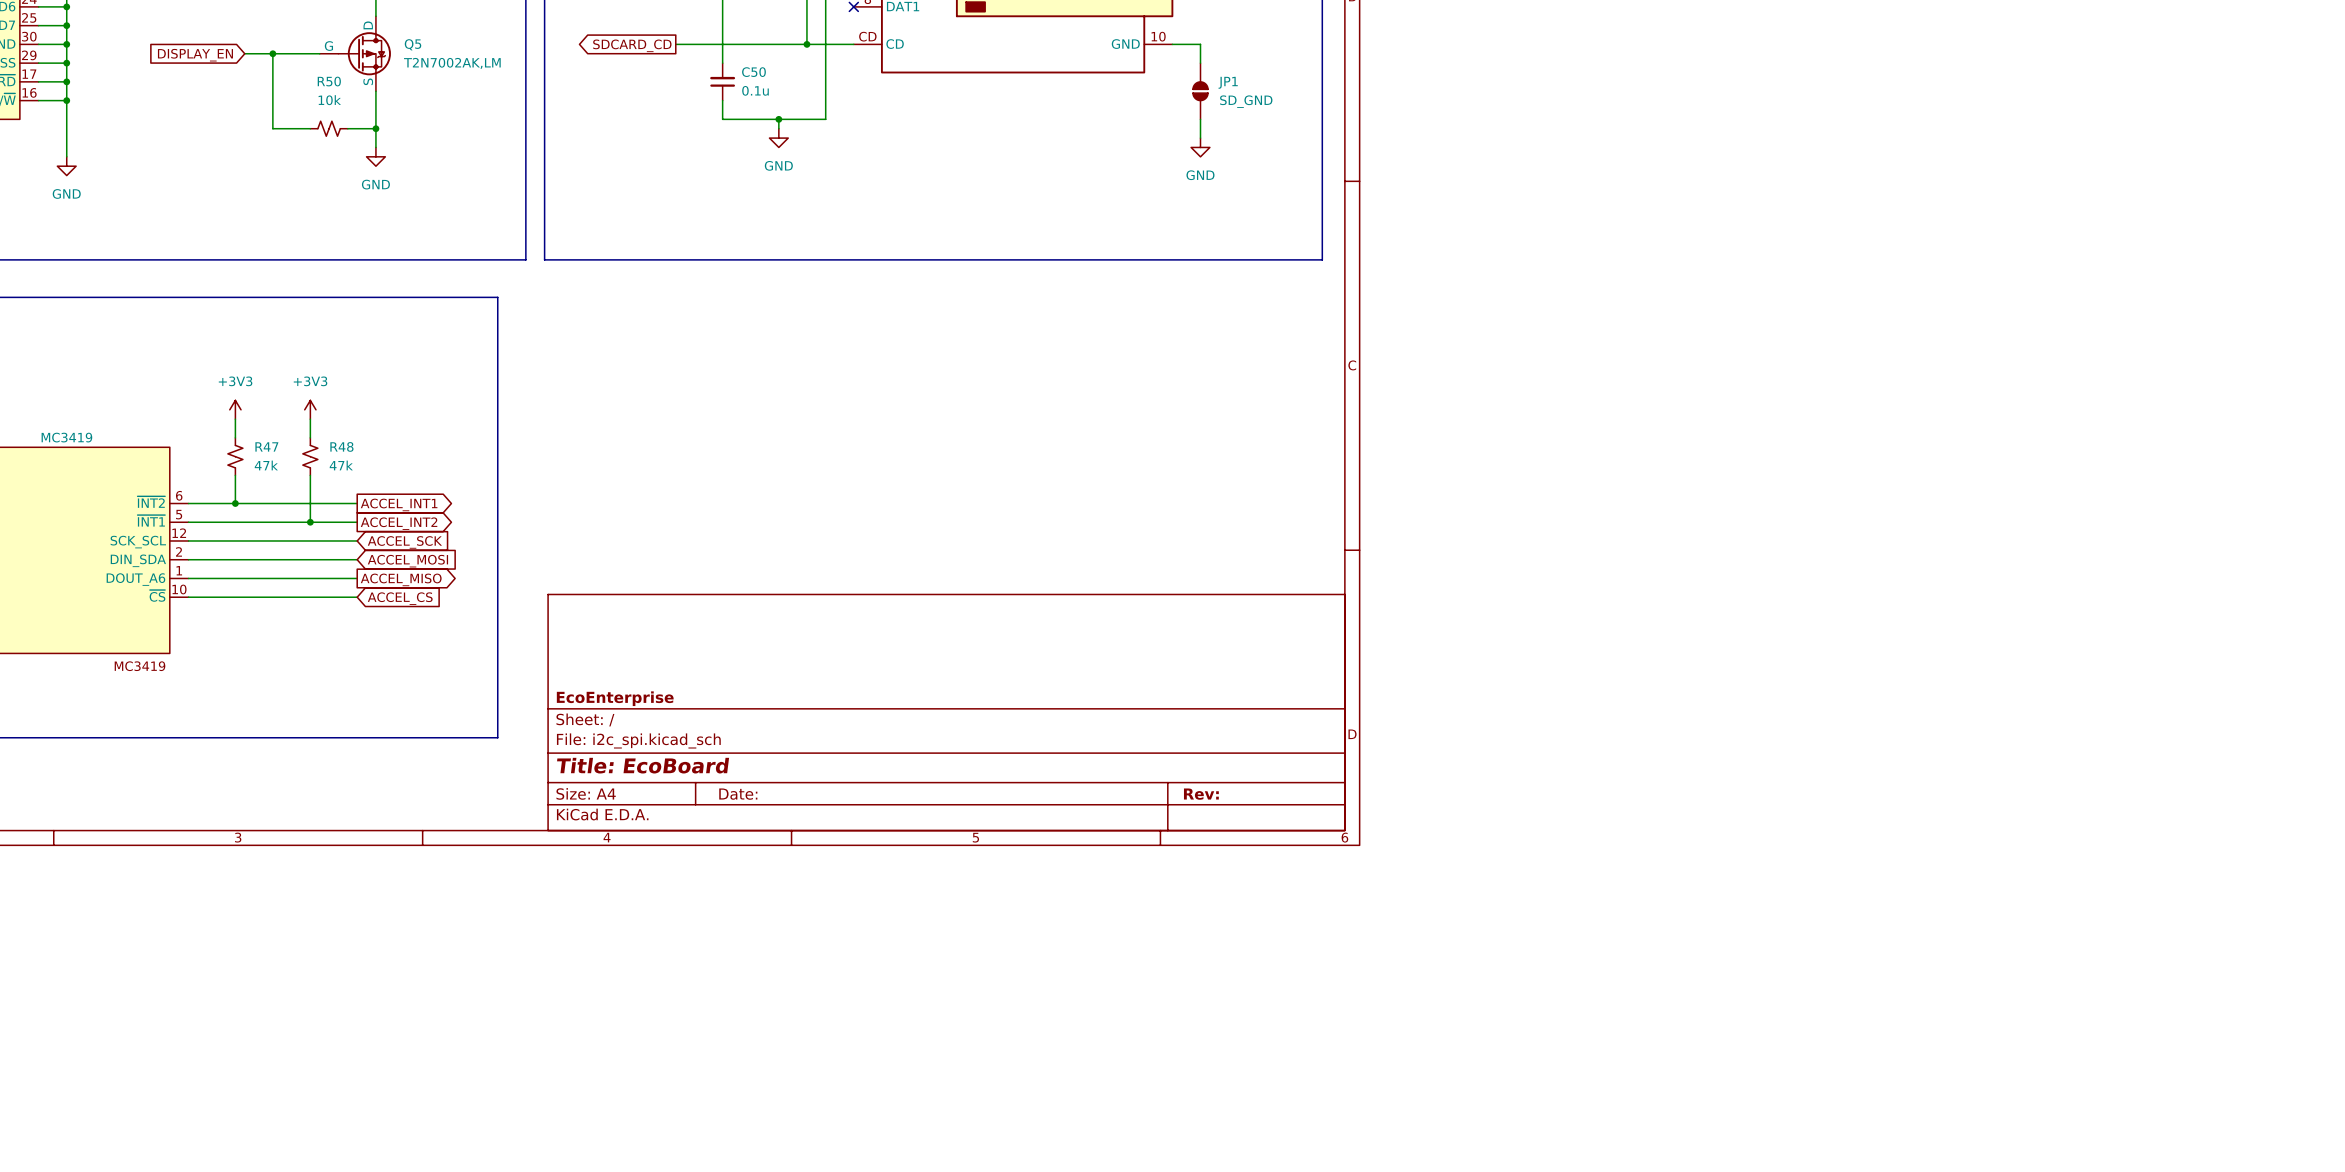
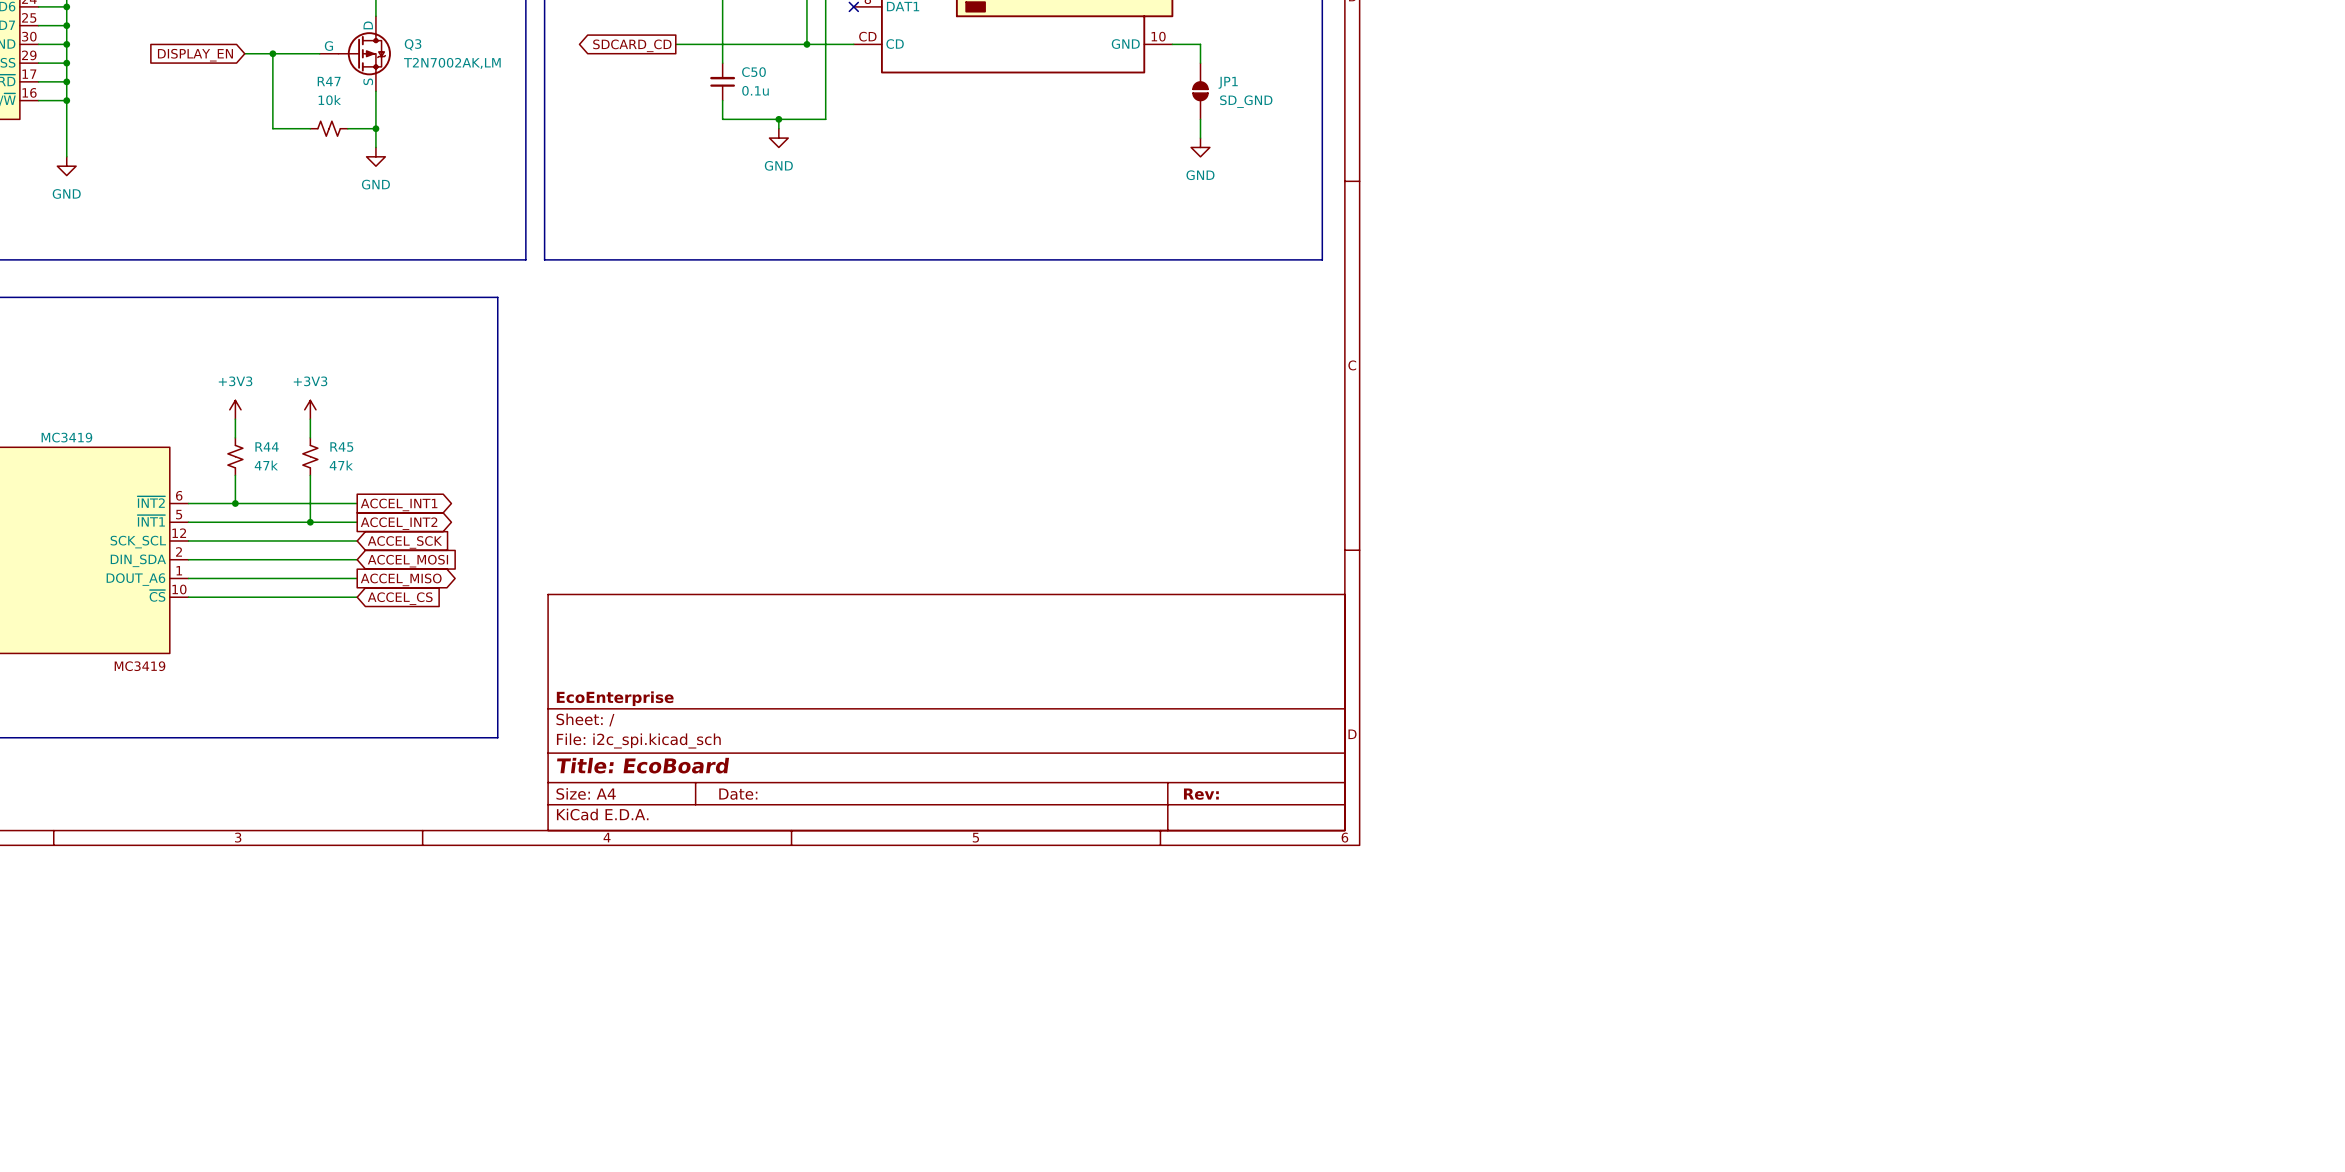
Q5 name: Q5 (413, 44) -> Q3 (413, 44)
R50 name: R50 (329, 81) -> R47 (329, 81)
R47 name: R47 (266, 446) -> R44 (267, 446)
R48 name: R48 (341, 446) -> R45 (341, 447)

